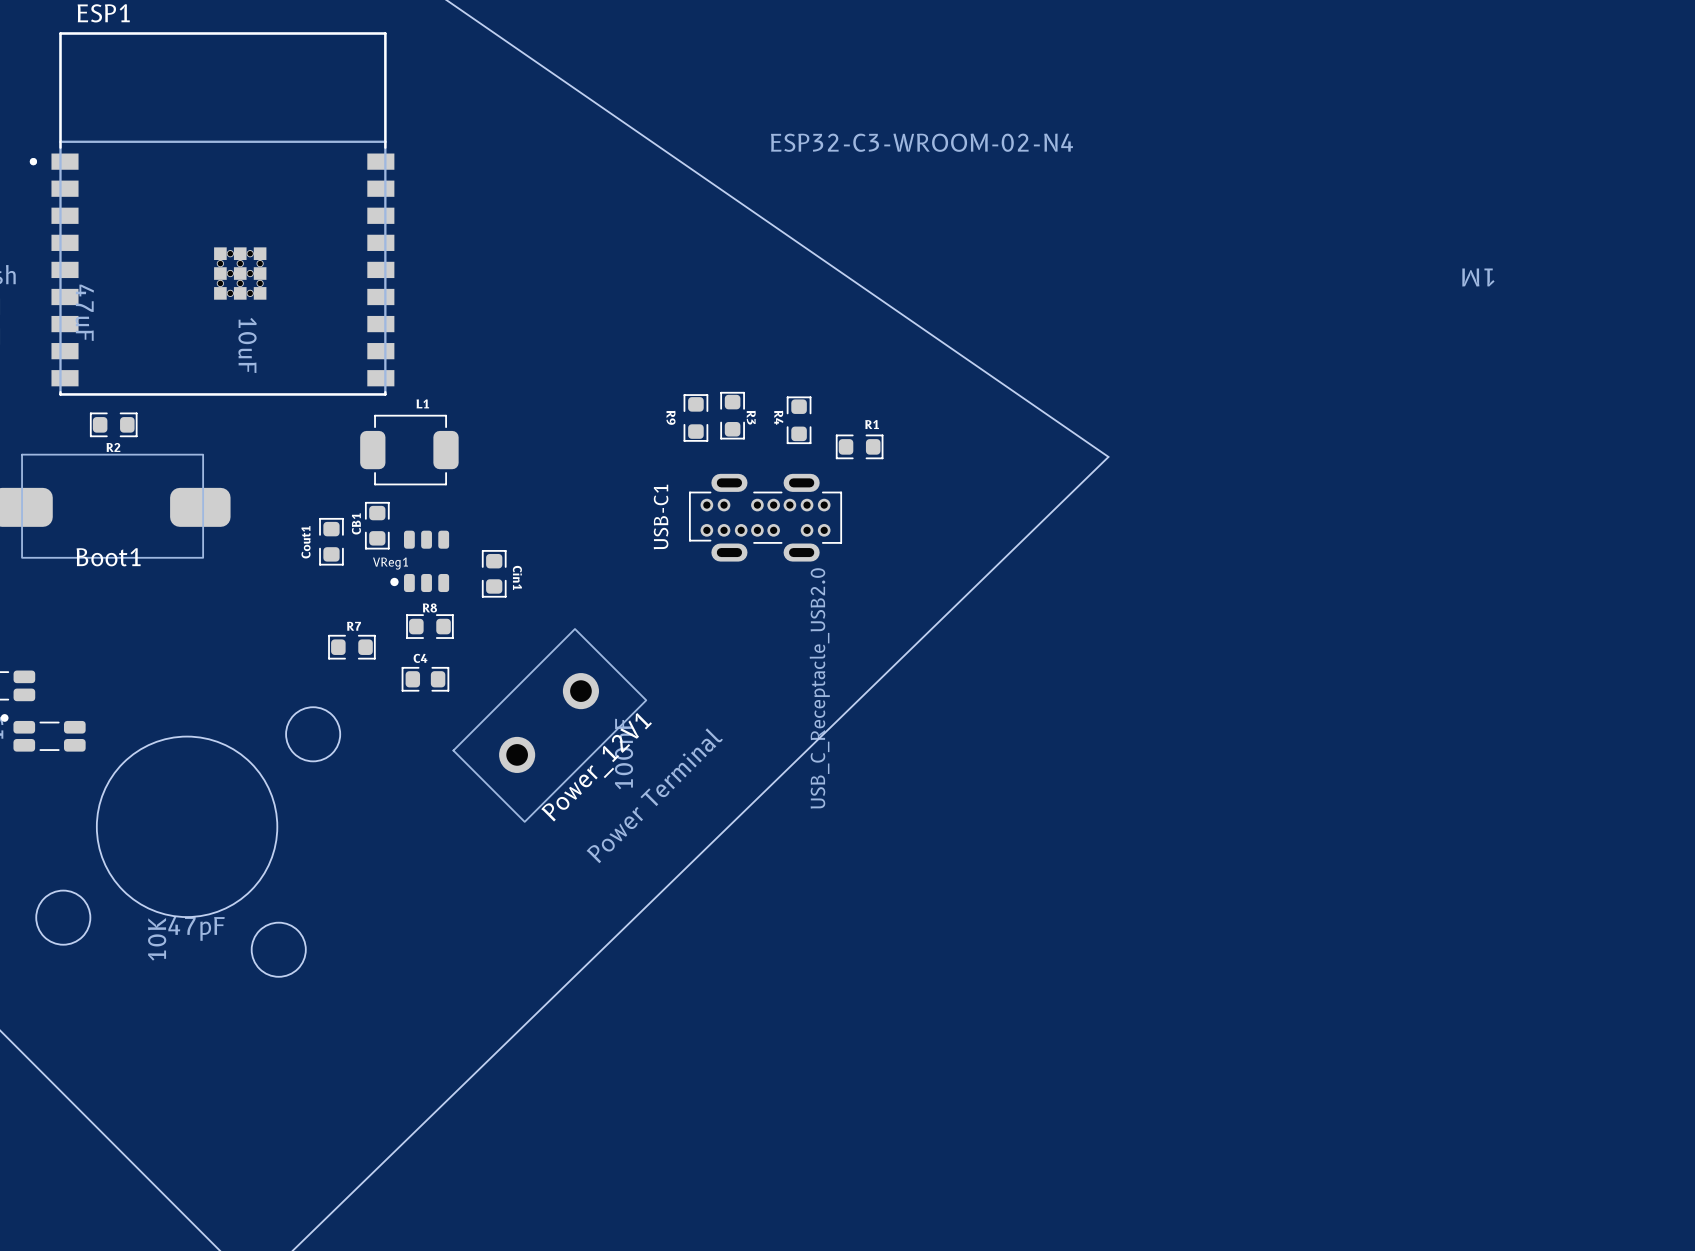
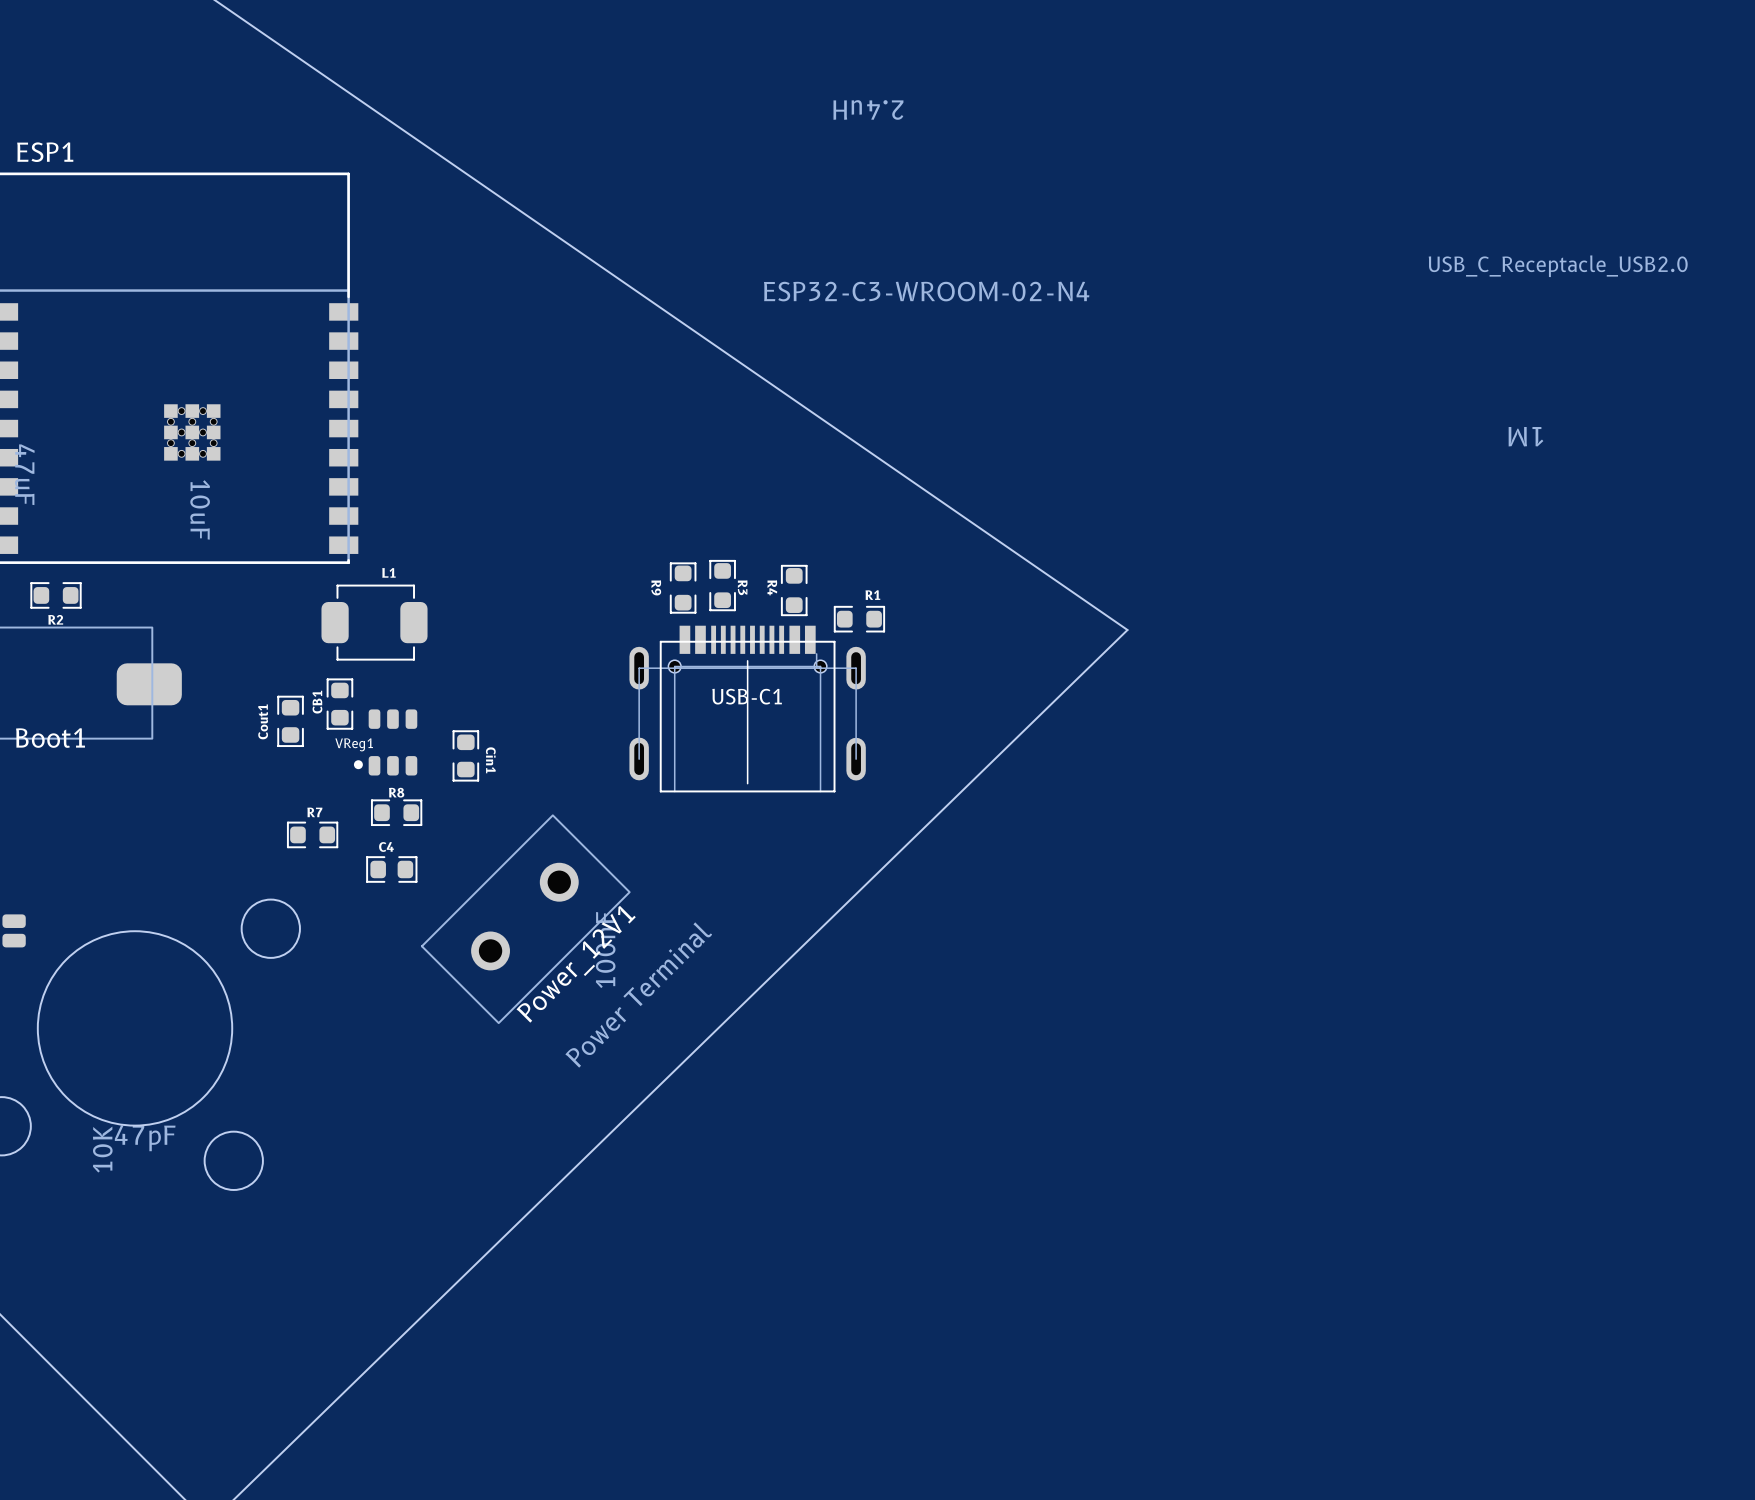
USB-C1 footprint: [688, 473, 843, 562] -> [629, 625, 866, 793]
USB-C1 name position: USB-C1 (661, 517) -> USB-C1 (747, 696)
USB-C1 value position: USB_C_Receptacle_USB2.0 (819, 688) -> USB_C_Receptacle_USB2.0 (1558, 266)

